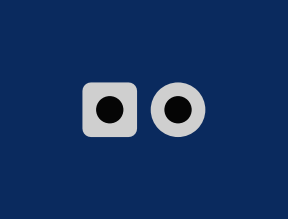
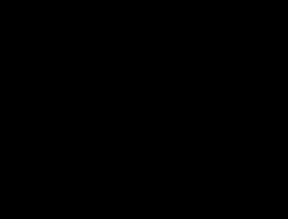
part: (143, 109) -> none

